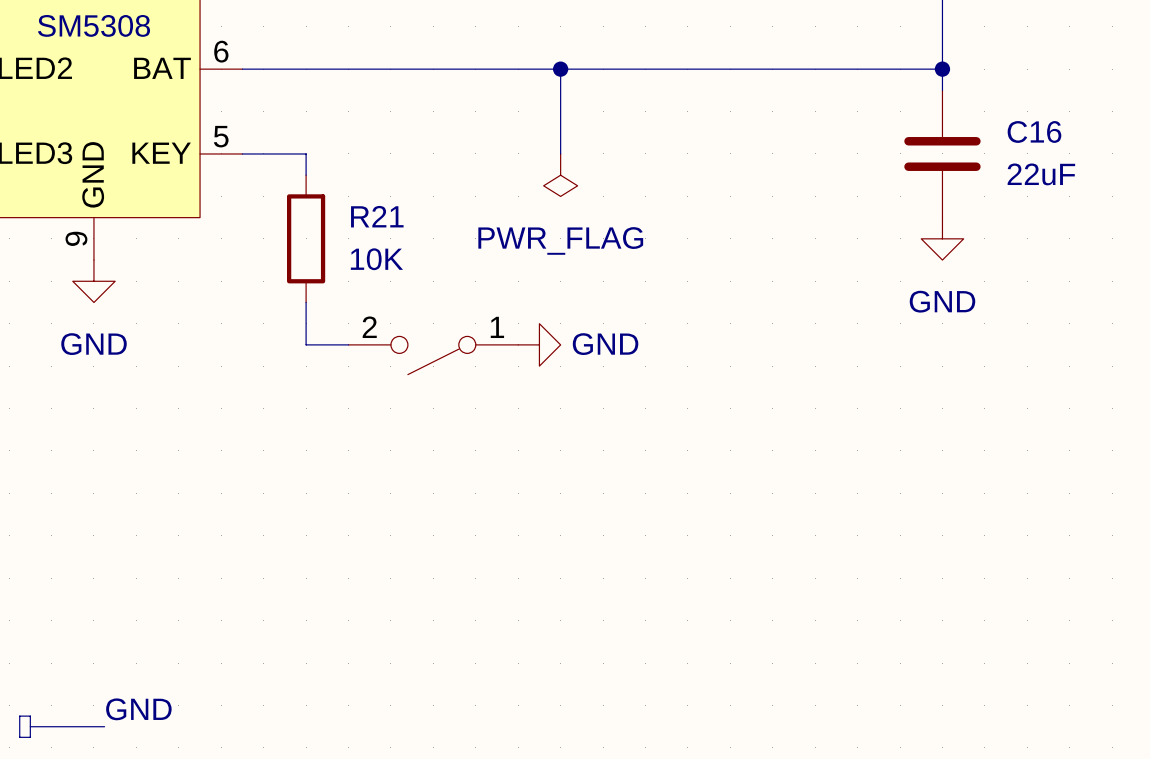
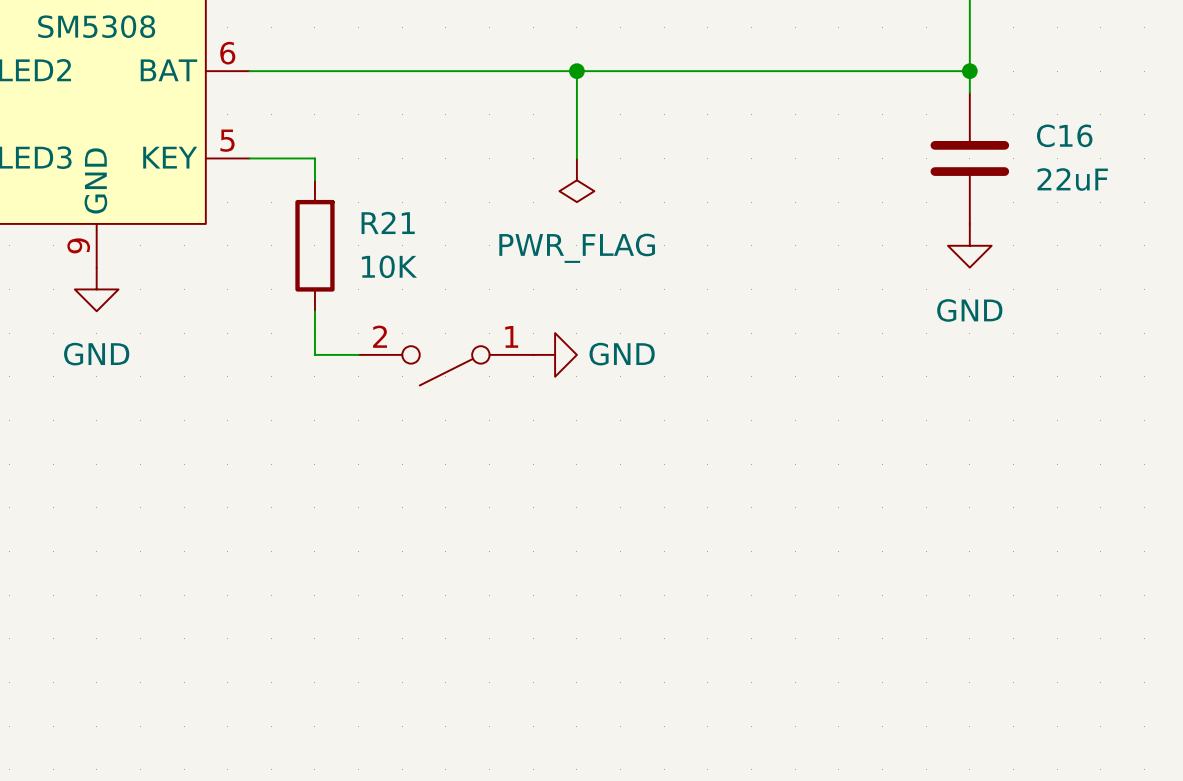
text: GND (138, 709) -> none
line: (19, 716) (30, 716) (30, 737) (19, 737) (19, 716) -> none
wire: (30, 726) (104, 726) -> none

